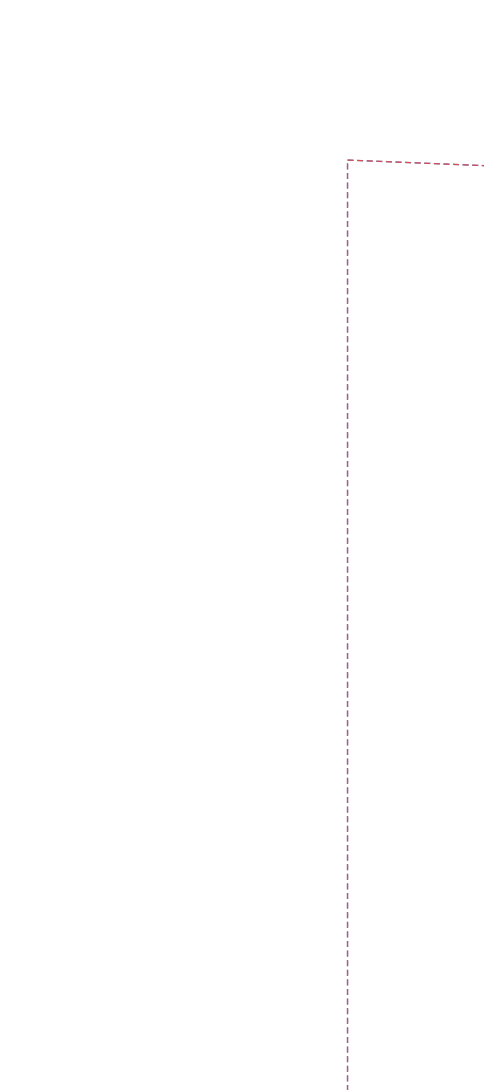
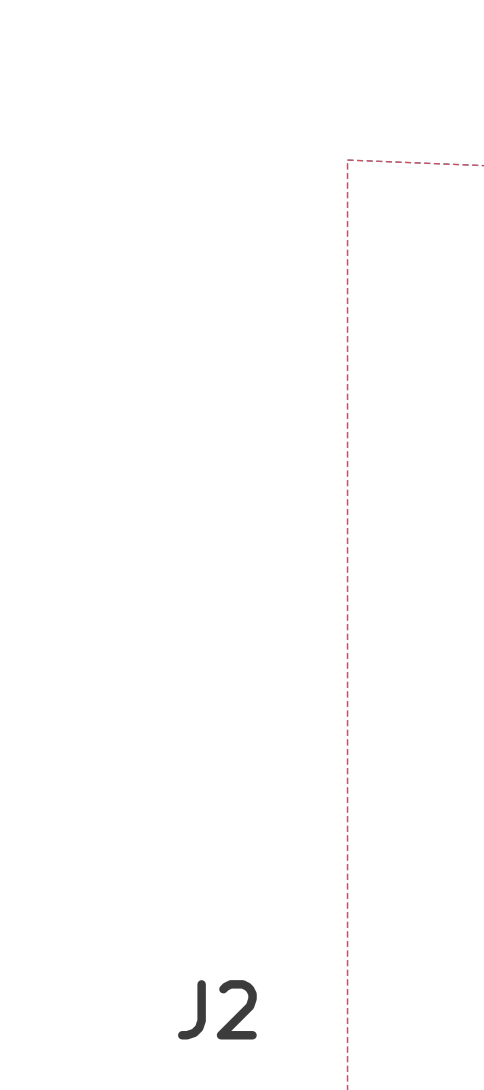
J2 name: none -> J2 (217, 1009)

